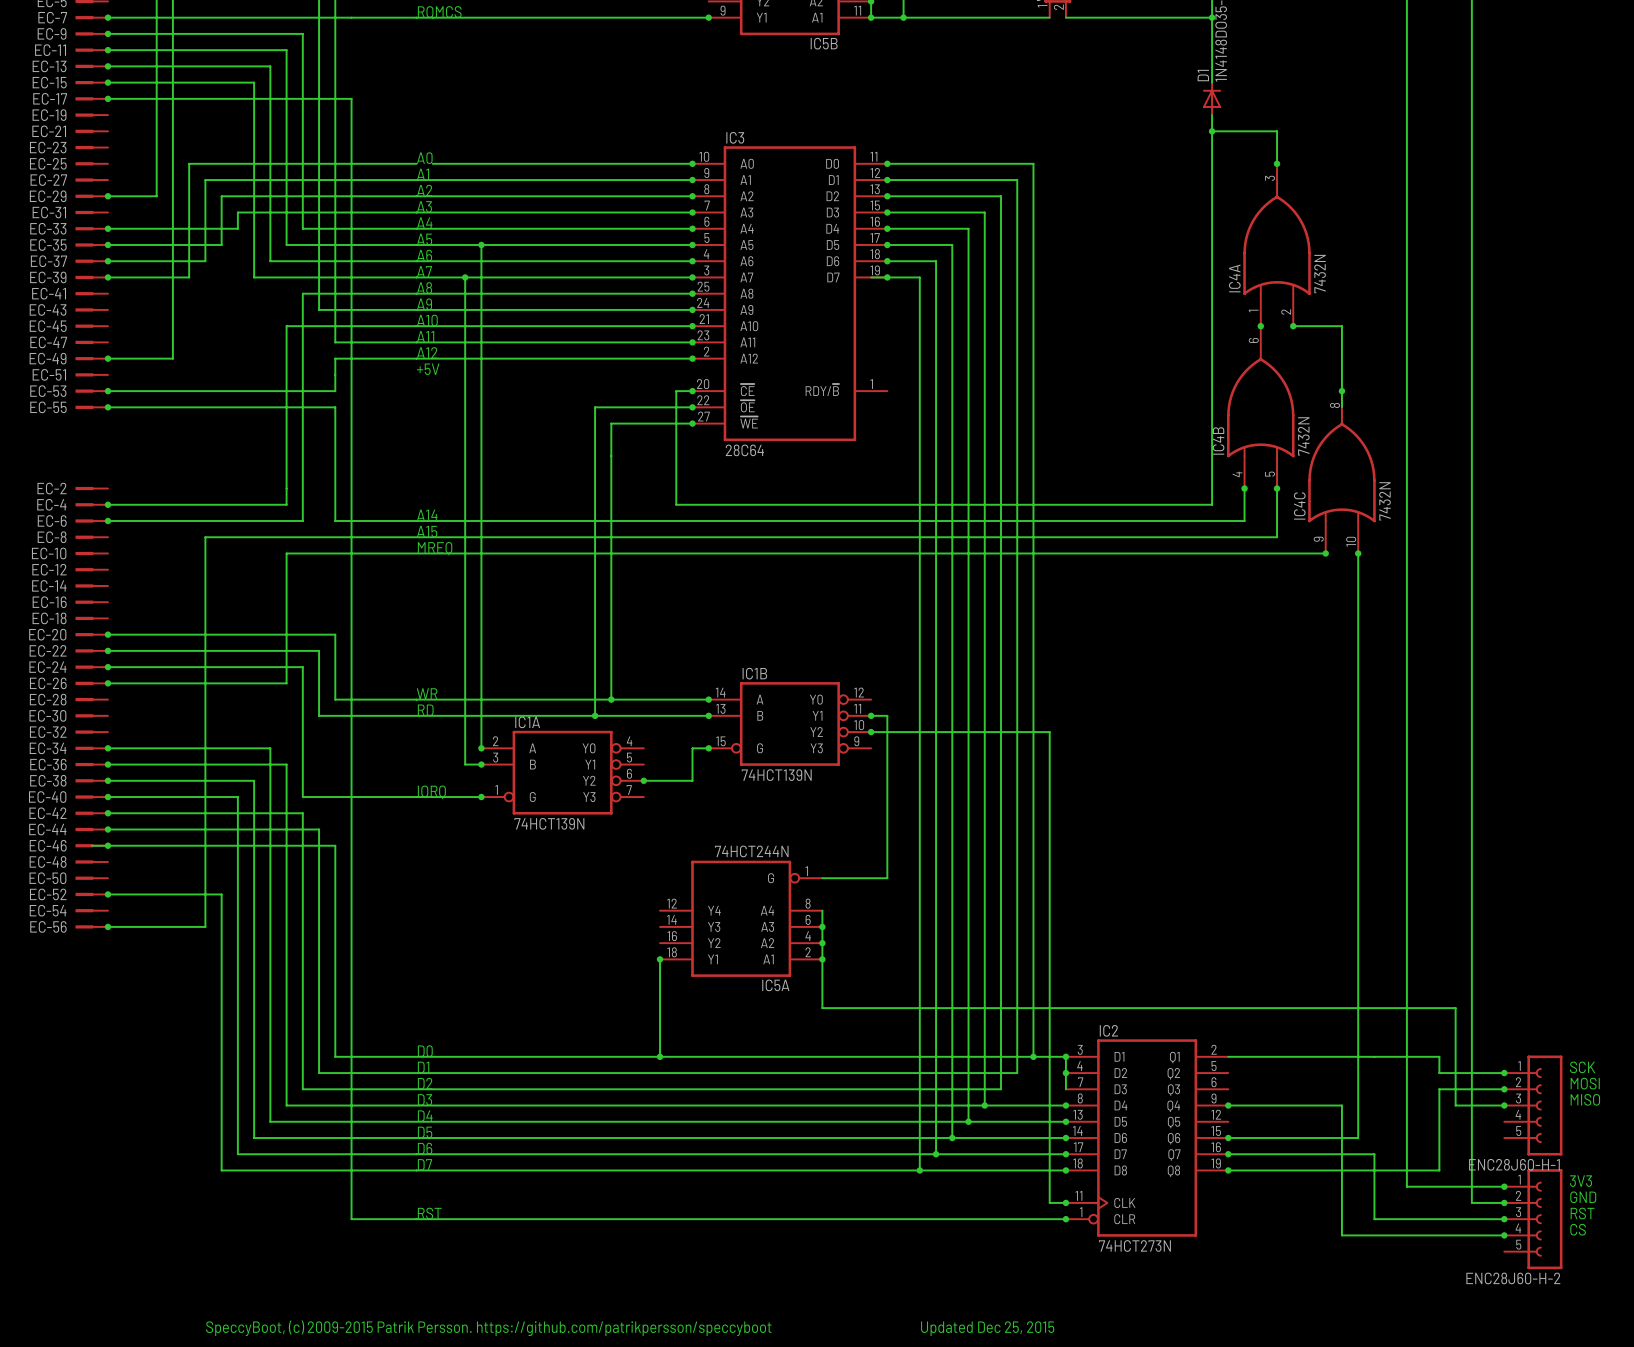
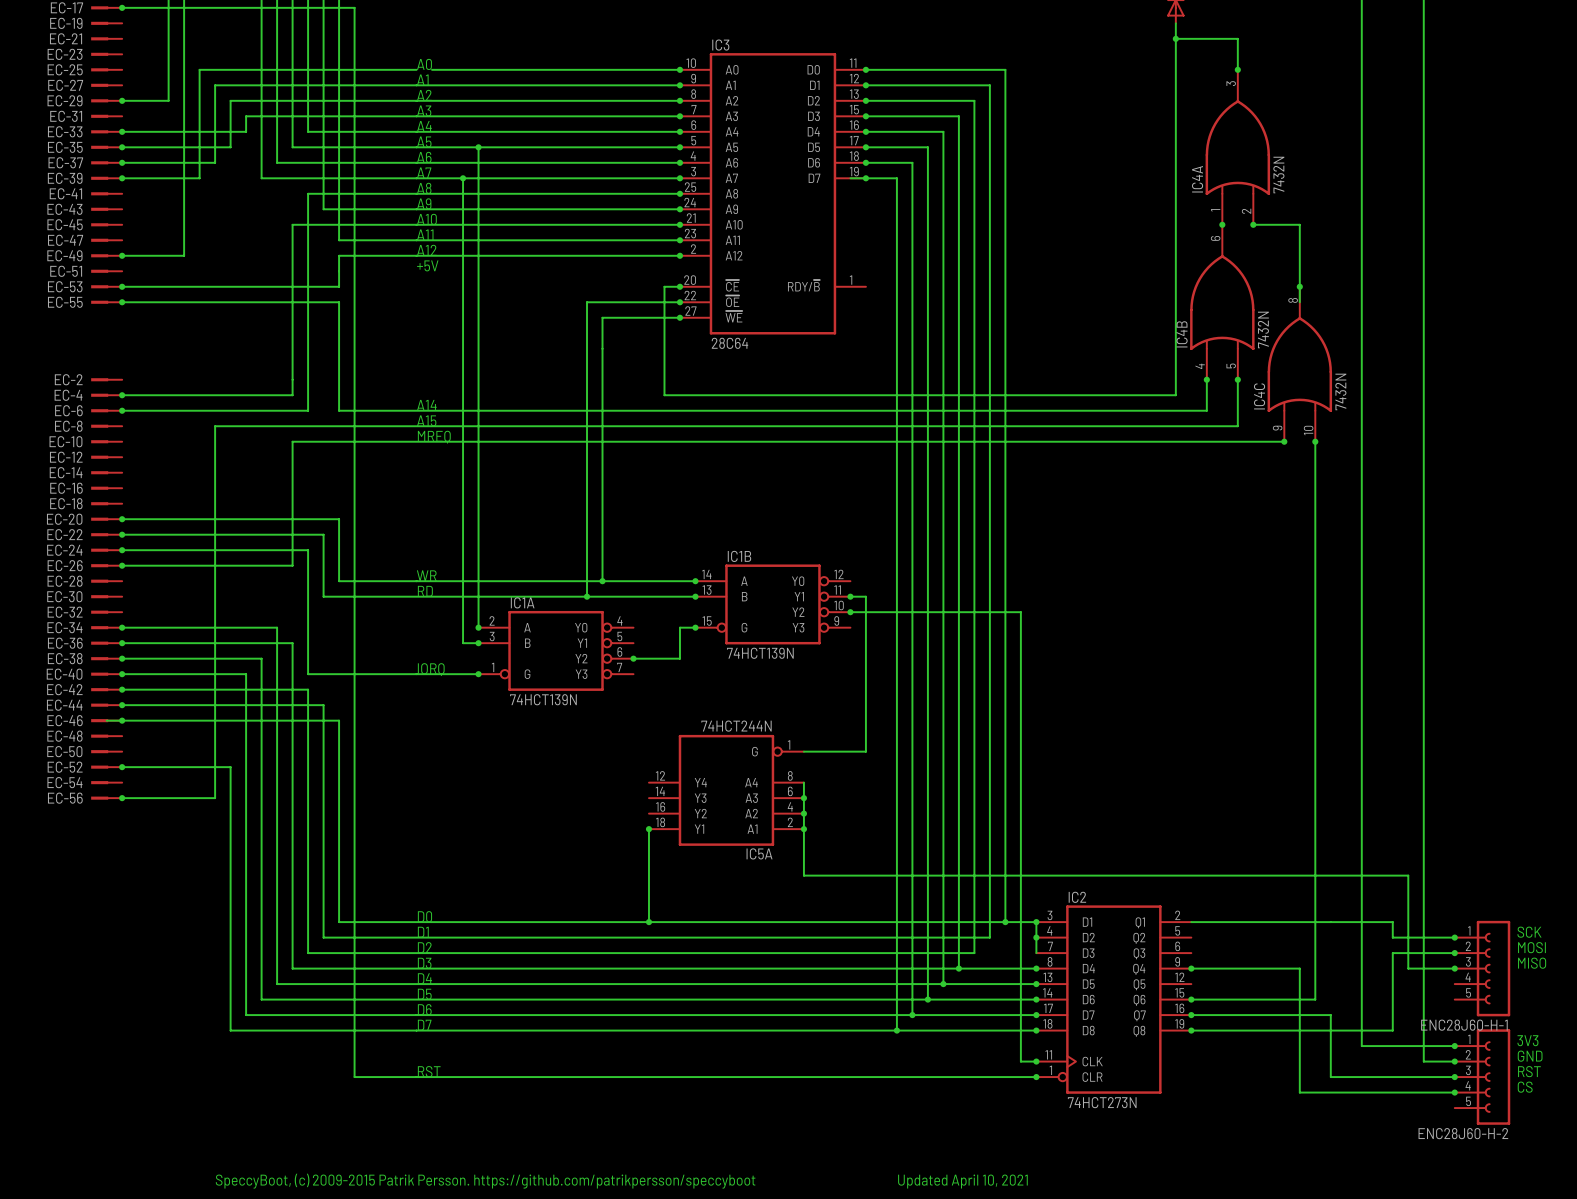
text: Updated Dec 25, 2015 (987, 1328) -> Updated April 10, 2021 (962, 1181)

